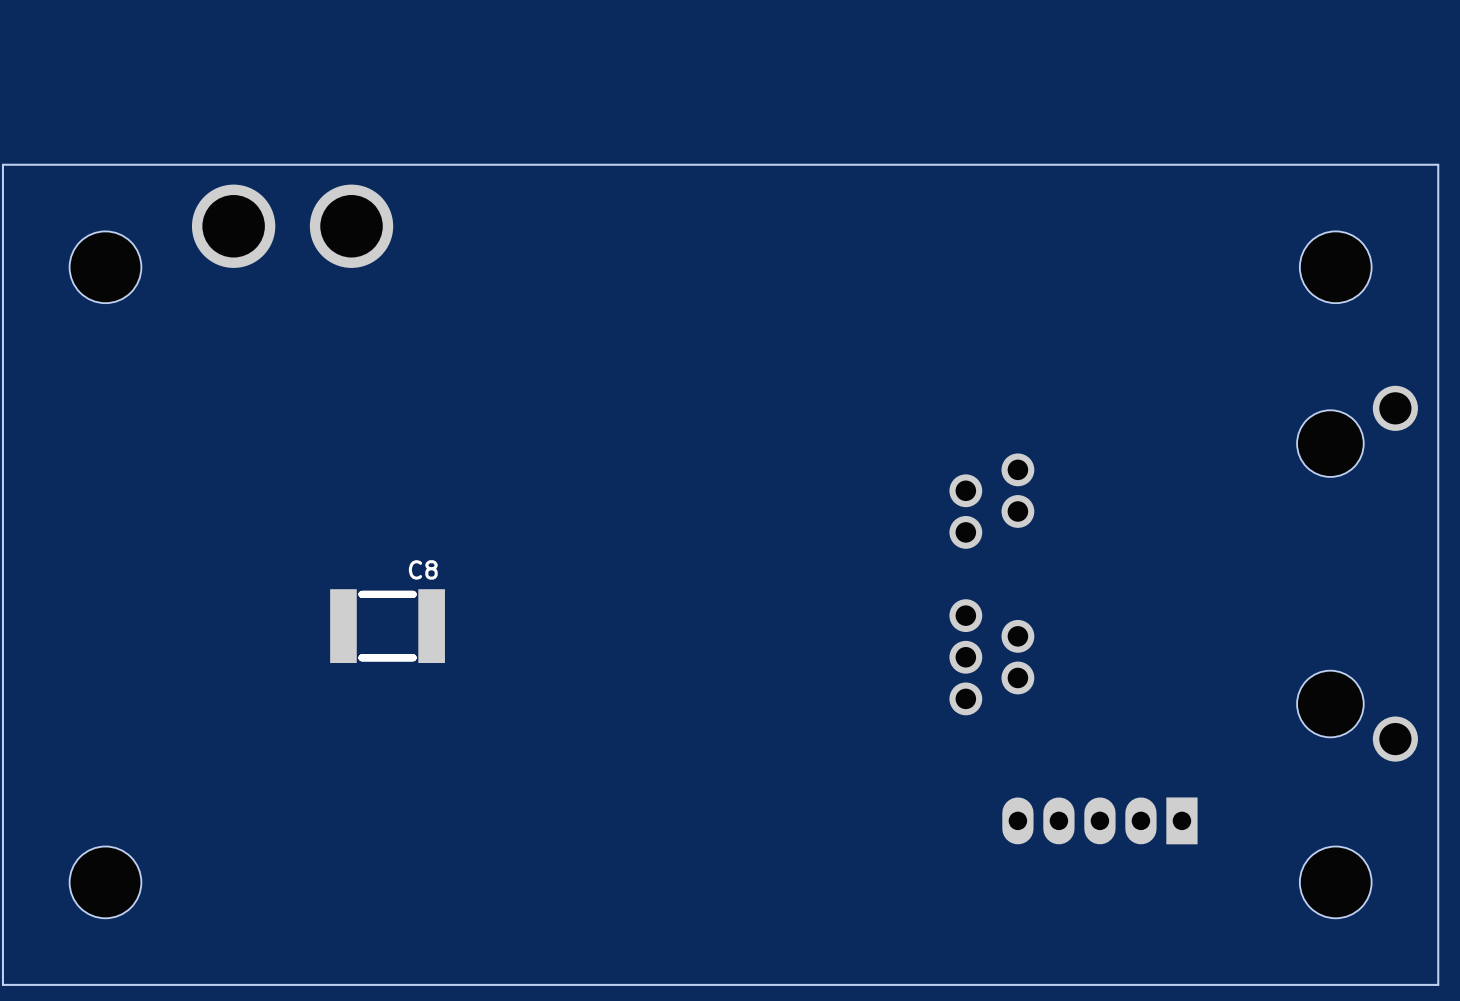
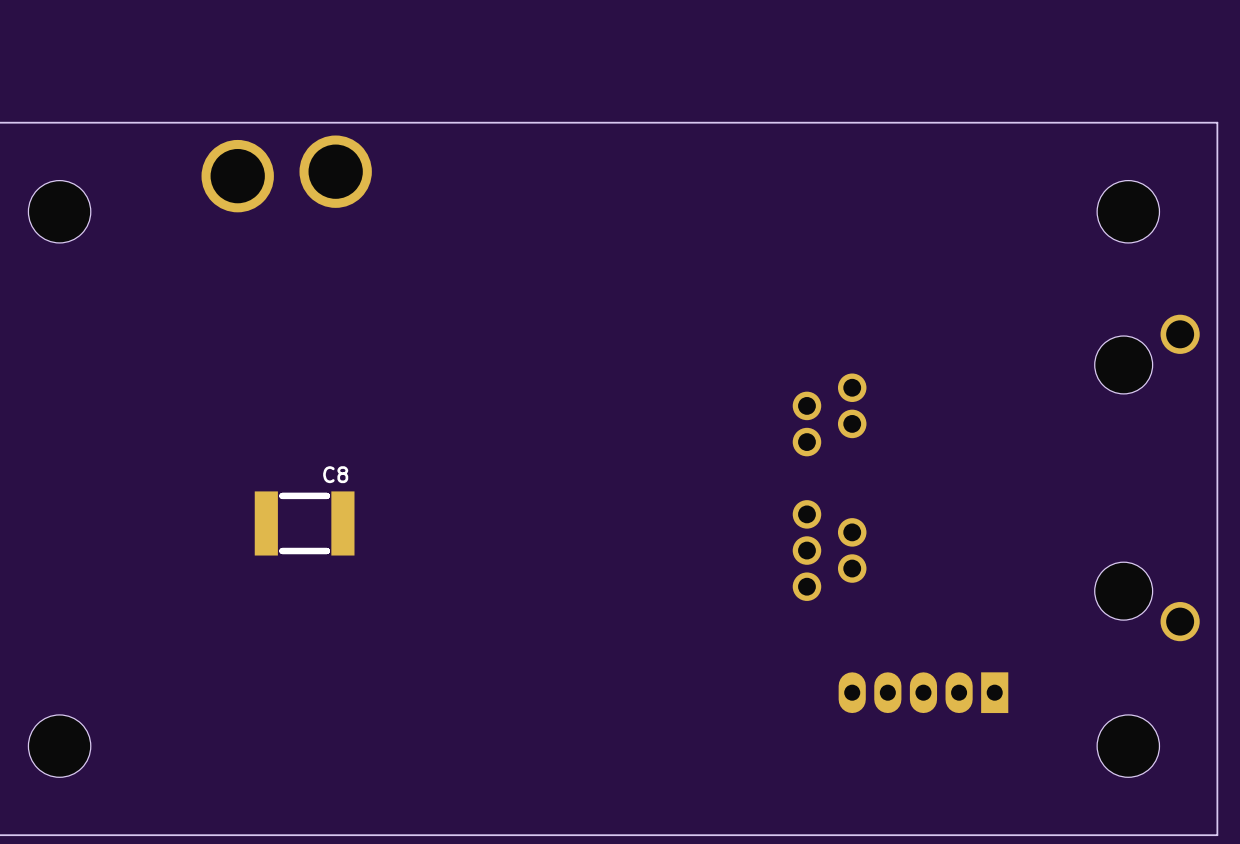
part: none -> (335, 171)
part: (233, 226) -> none
part: none -> (237, 176)
part: (351, 226) -> none

